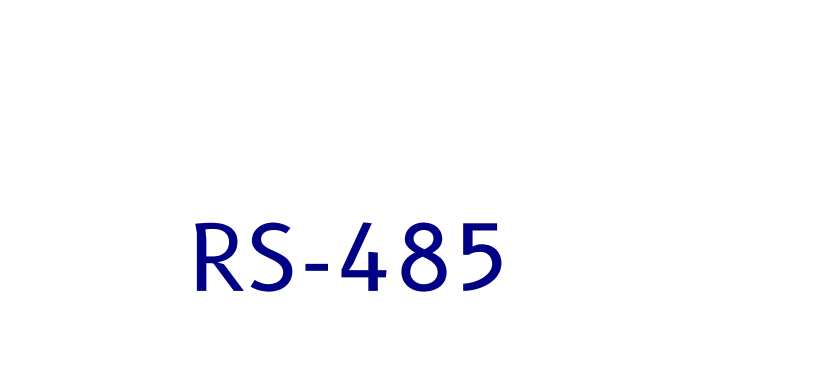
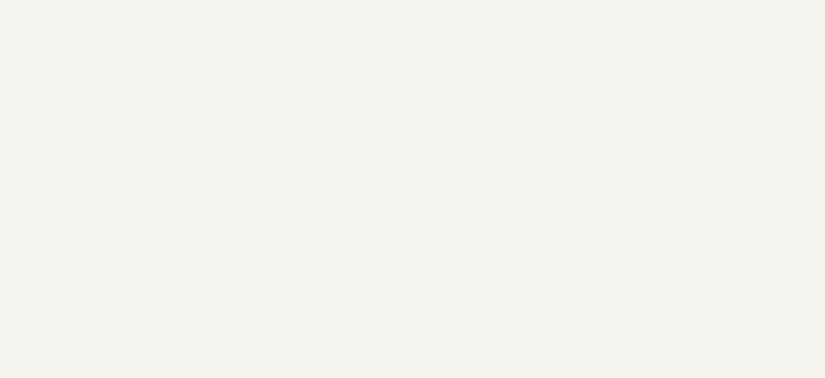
text: RS-485 (348, 257) -> none

